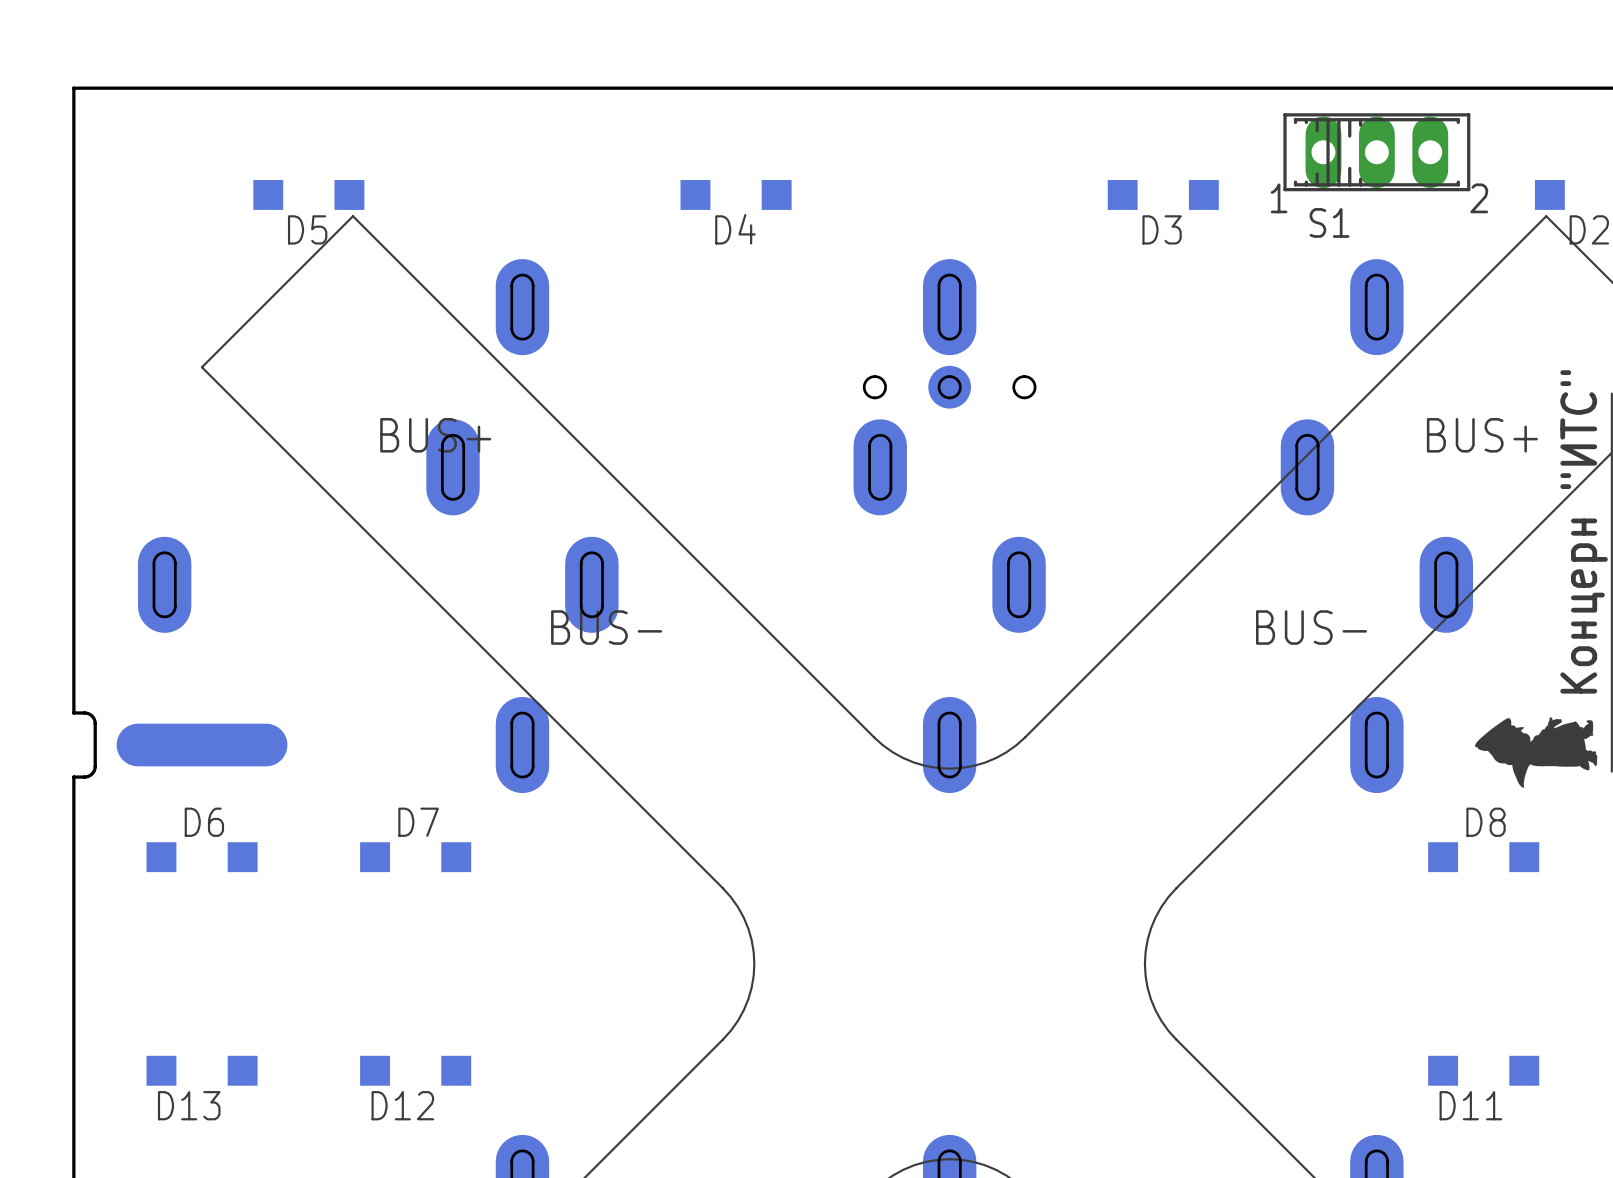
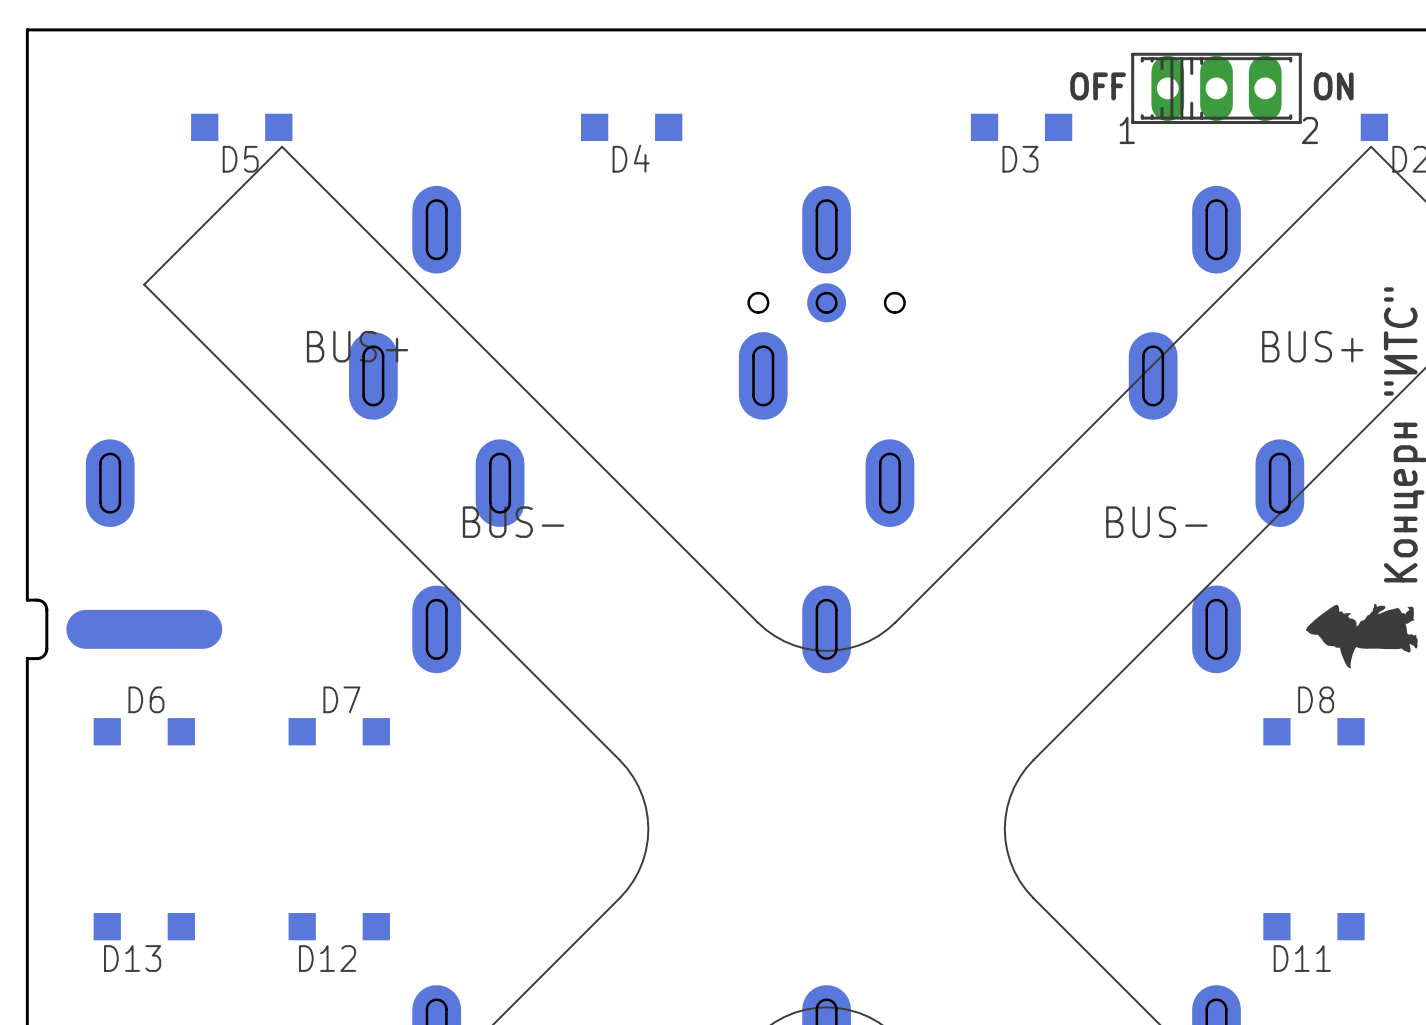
text: none -> OFF (1098, 86)
text: none -> ON (1333, 86)
S1 name: S1 (1329, 222) -> none

